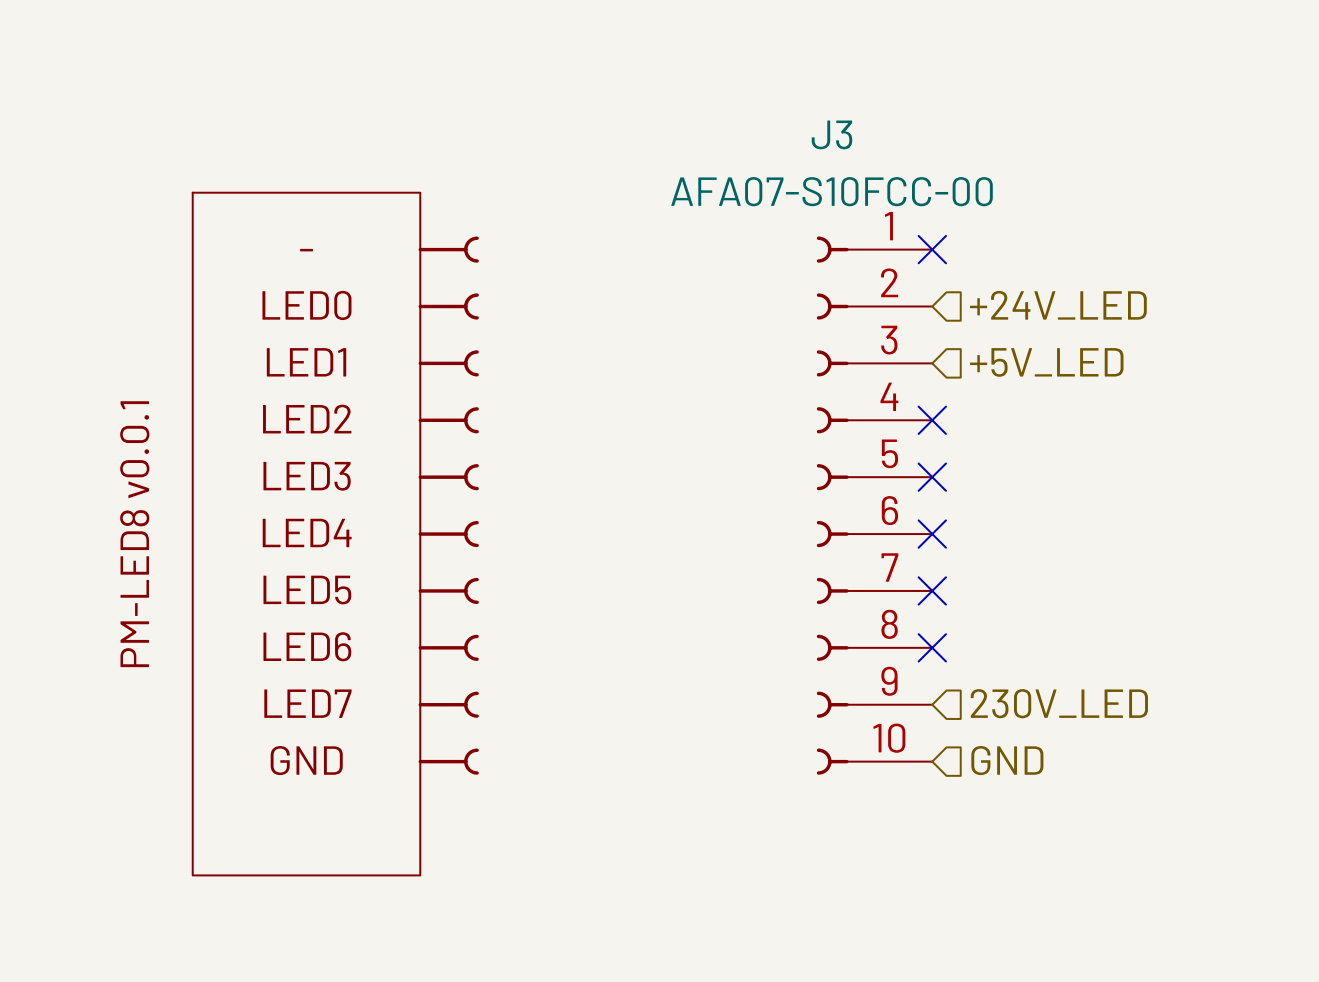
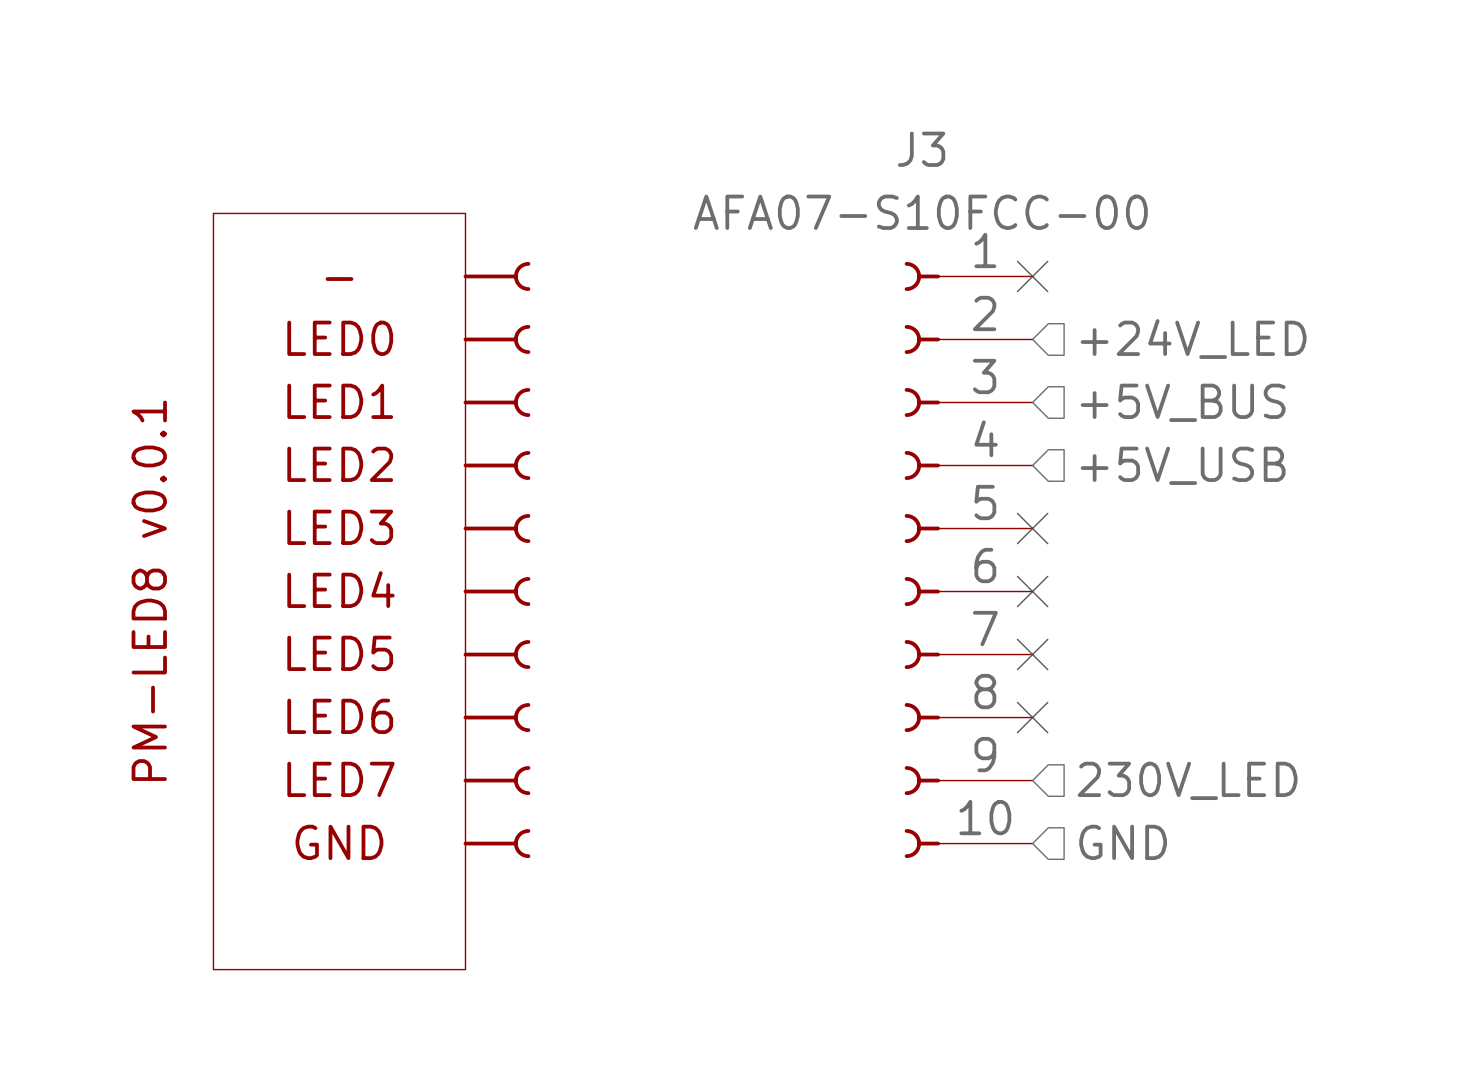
hierarchical label: +5V_LED (1046, 362) -> +5V_BUS (1183, 402)
hierarchical label: none -> +5V_USB (1183, 465)
no-connect mark: (932, 420) -> none

